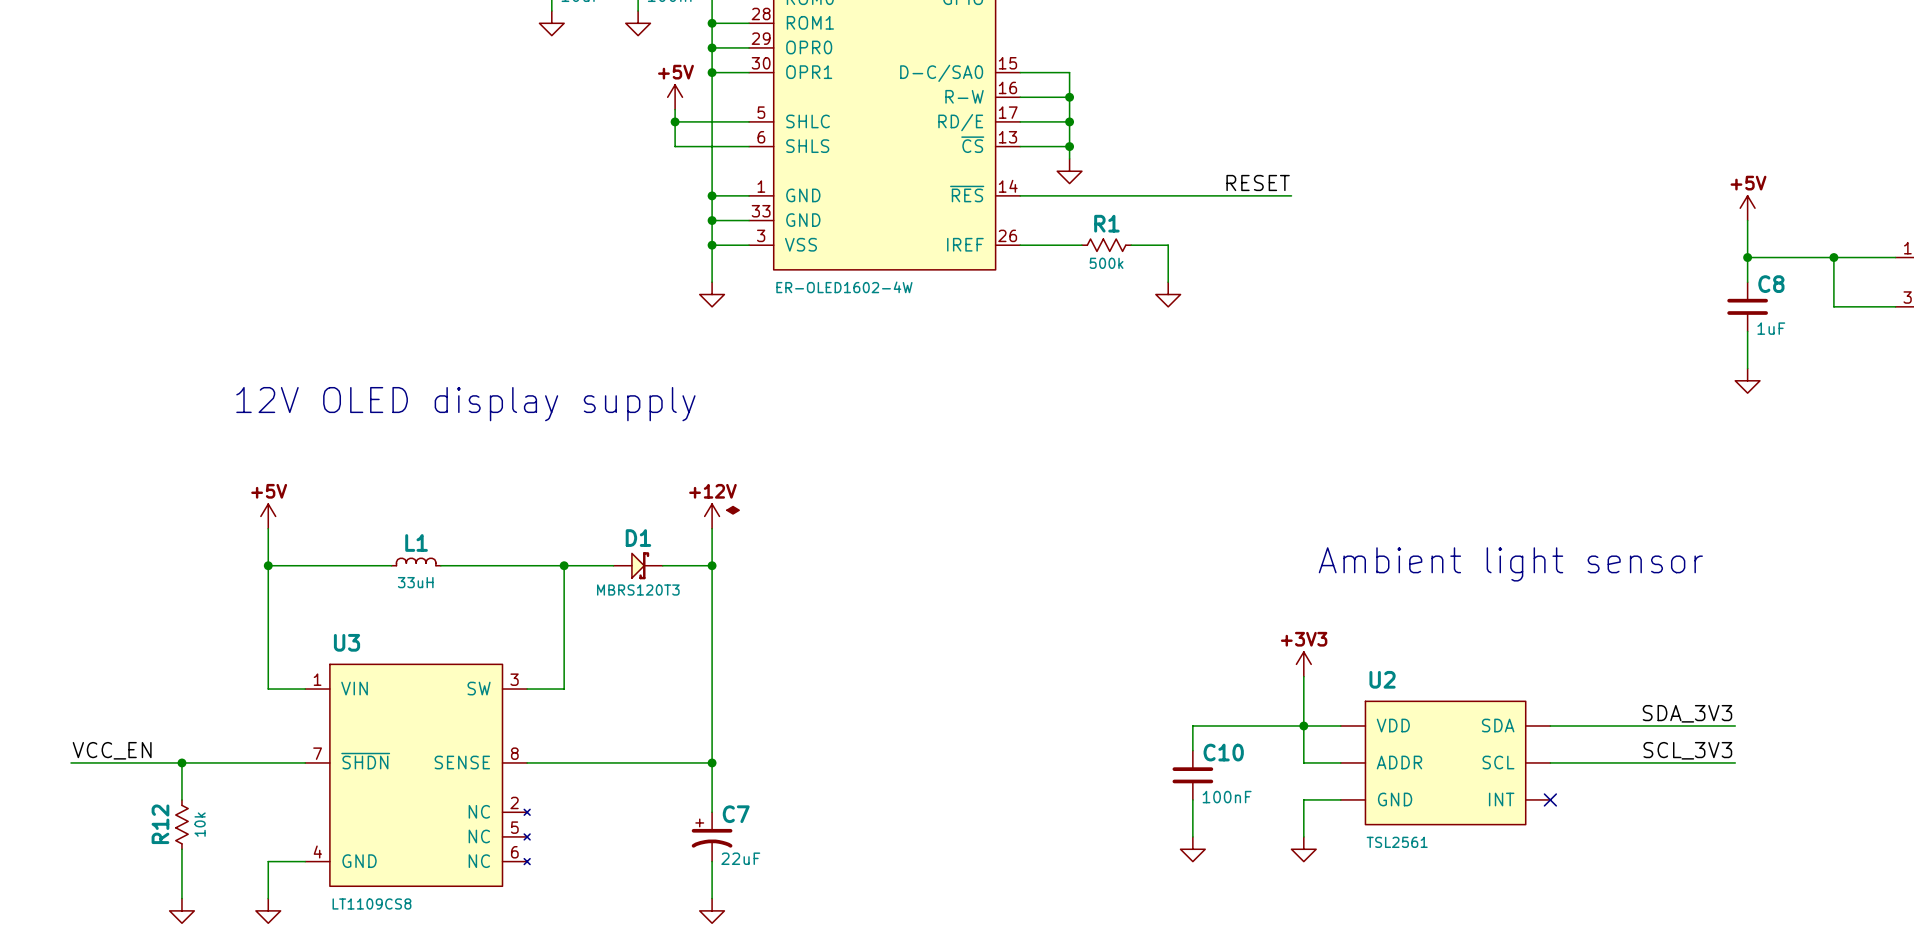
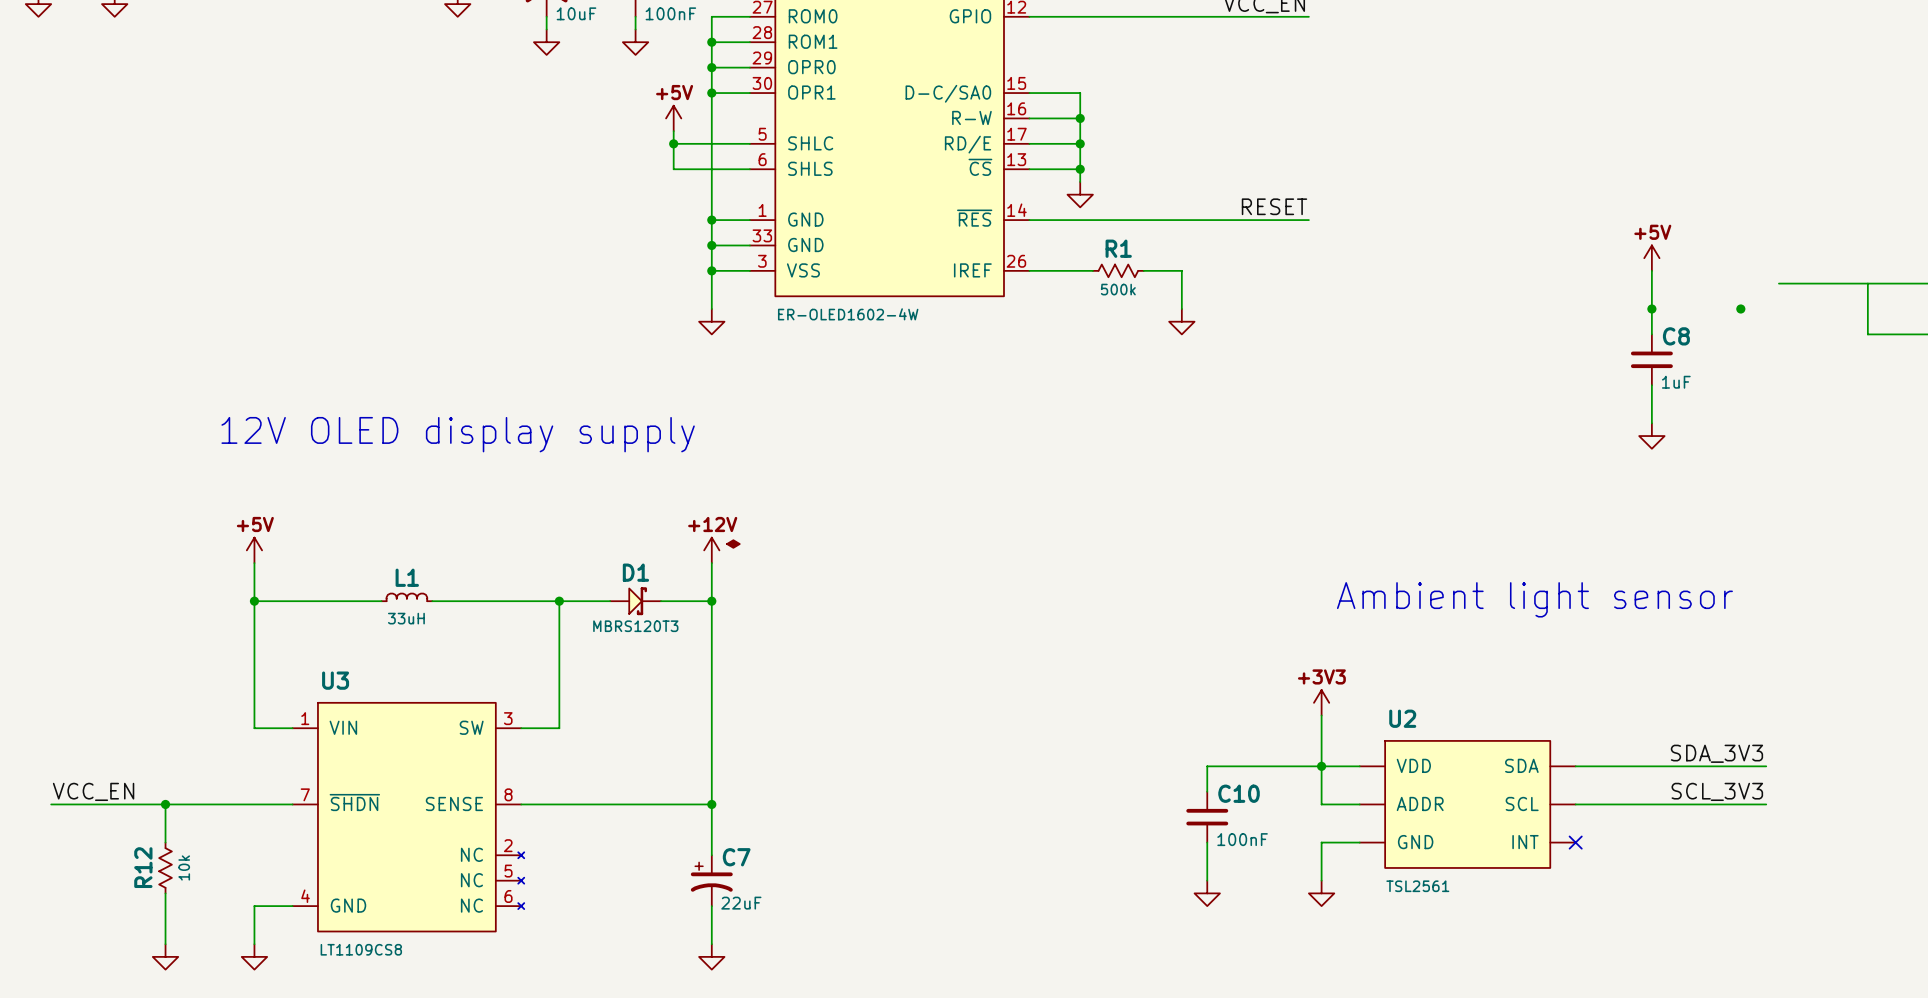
power symbol position: (1747, 208) -> (1651, 258)
wire: (1747, 220) (1747, 282) -> (1651, 270) (1651, 334)
junction position: (1747, 257) -> (1740, 309)
junction: (1833, 257) -> none
junction: none -> (1651, 309)
C8 position: (1747, 306) -> (1651, 359)
wire: (1747, 331) (1747, 368) -> (1651, 385) (1651, 423)
power symbol position: (1747, 380) -> (1651, 436)

